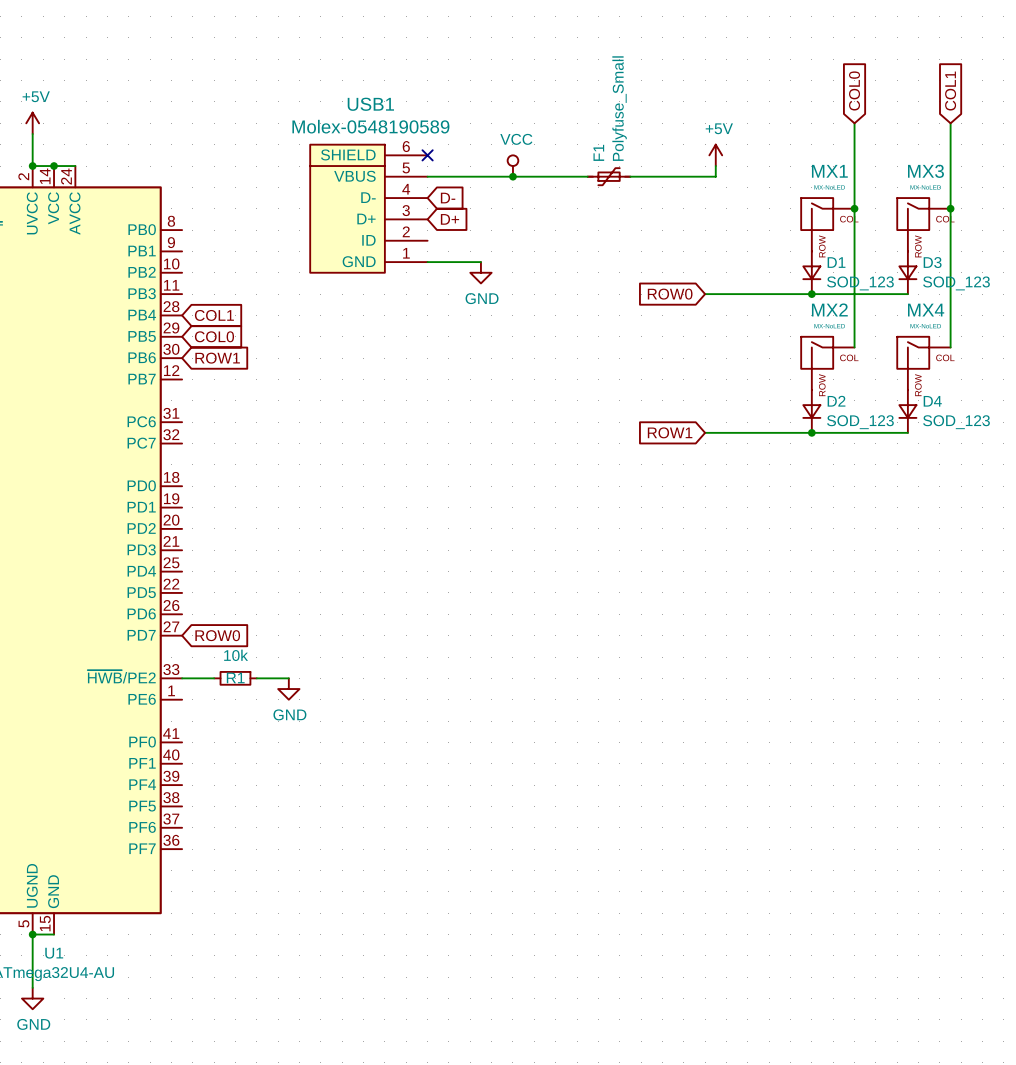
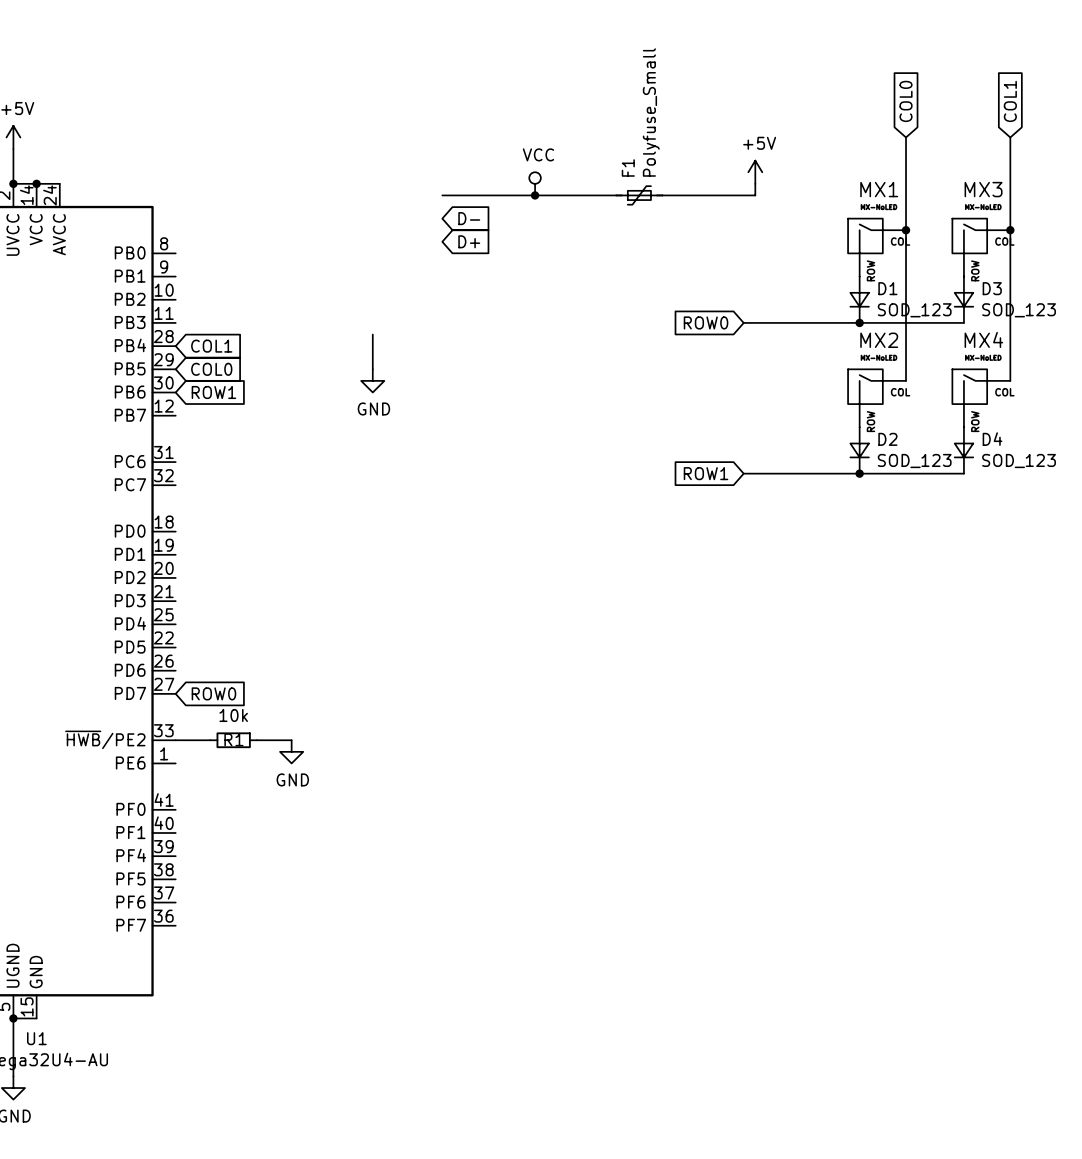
no-connect mark: (427, 155) -> none
USB1: Molex-0548190589 (368, 208) -> none
wire: (427, 262) (480, 262) -> none
power symbol position: GND (480, 272) -> GND (372, 380)
wire: none -> (372, 334) (372, 369)

